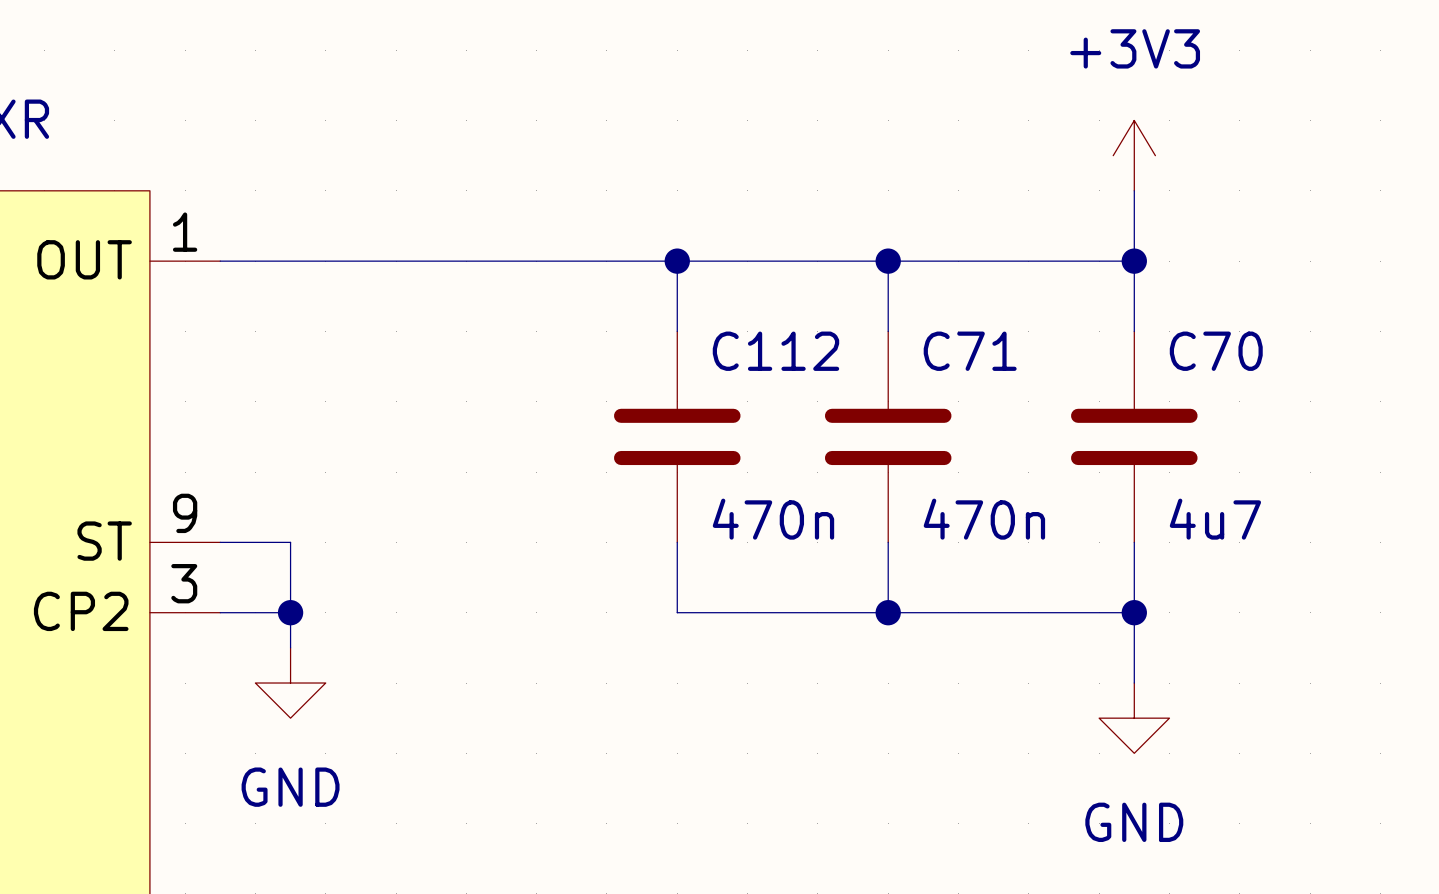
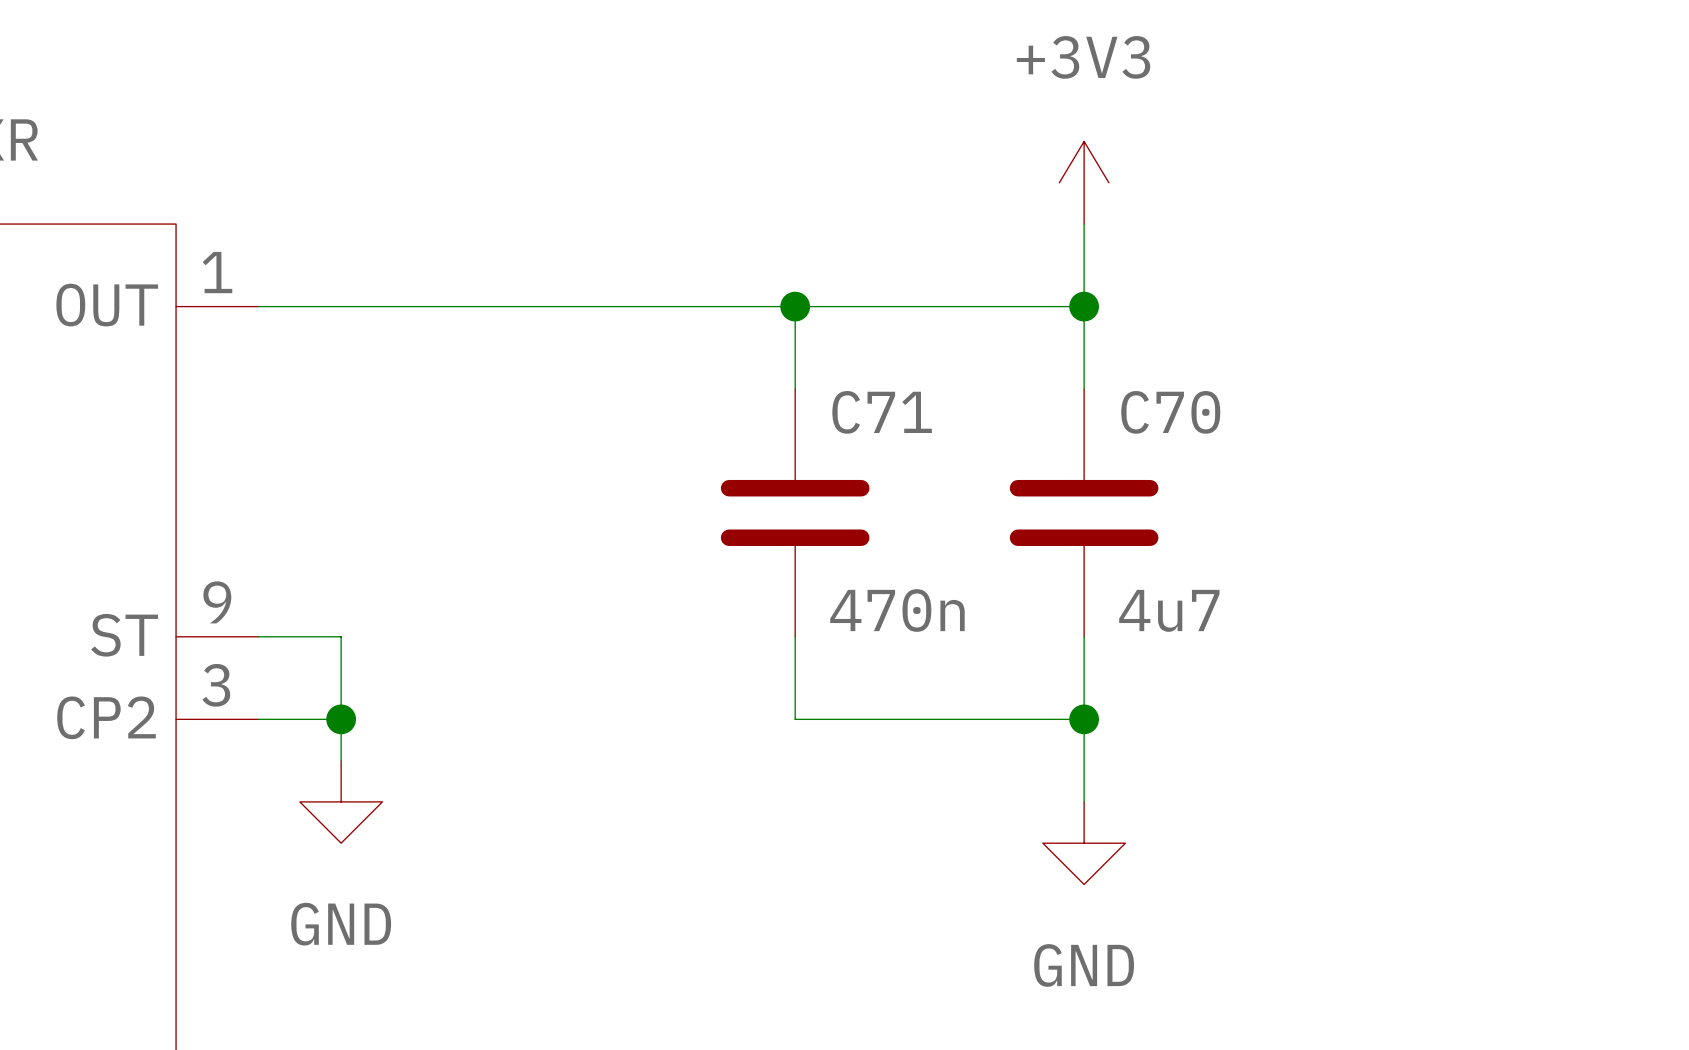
power symbol position: +3V3 (1134, 155) -> +3V3 (1084, 182)
wire: (1134, 190) (1134, 331) -> (1084, 224) (1084, 389)
wire: (888, 261) (888, 331) -> none
junction position: (888, 261) -> (1084, 306)
wire: (923, 261) (1134, 261) -> none
junction: (1134, 261) -> none
C112 name: C112 (775, 351) -> C71 (882, 412)
C71: 470n (888, 436) -> none
C70 position: (1134, 436) -> (1084, 512)
wire: (888, 542) (888, 612) -> none
wire: (1134, 542) (1134, 683) -> (1084, 636) (1084, 801)
junction position: (888, 612) -> (1084, 719)
wire: (923, 612) (1134, 612) -> none
junction: (1134, 612) -> none
power symbol position: GND (1134, 718) -> GND (1084, 843)

